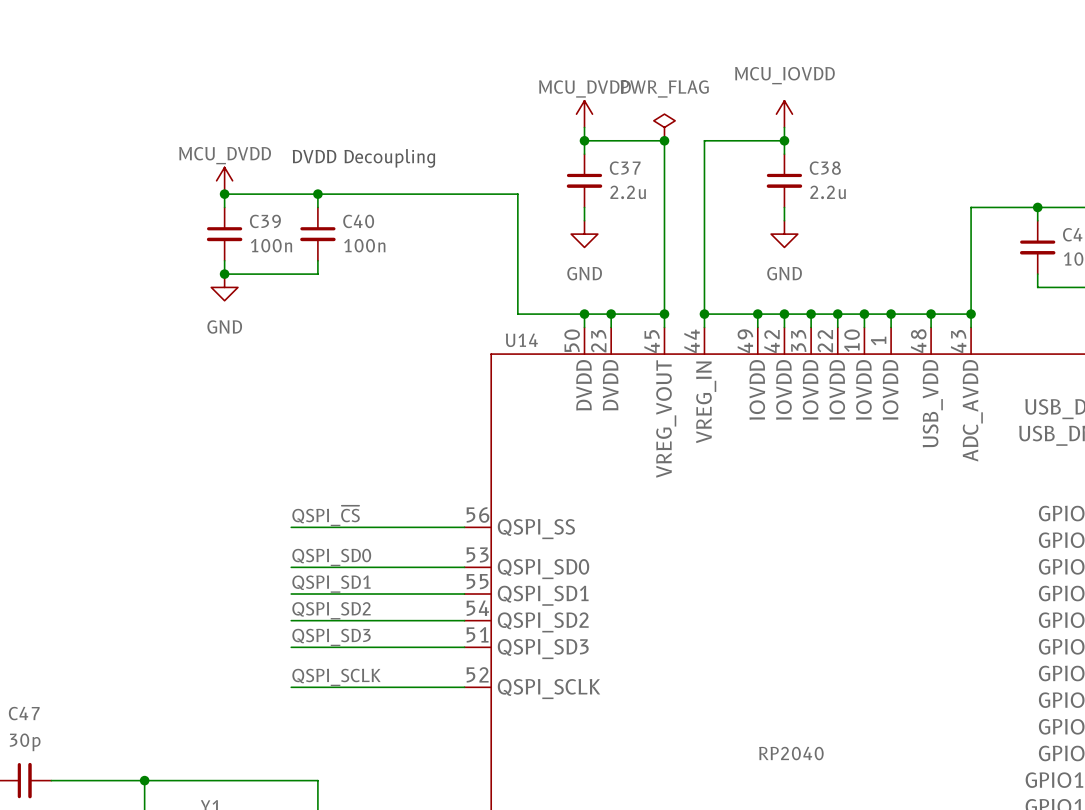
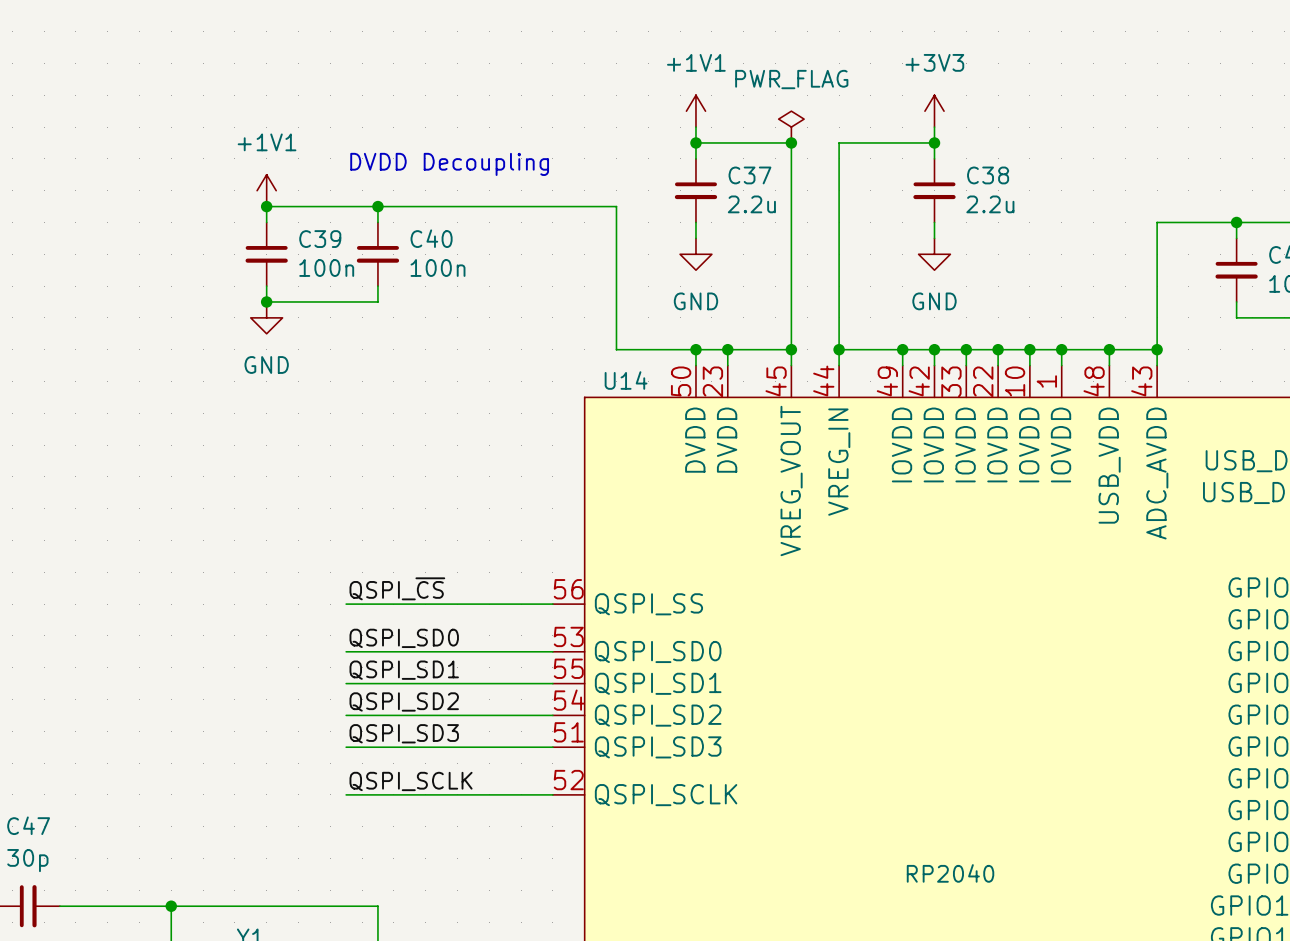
power symbol: MCU_DVDD (584, 114) -> +1V1 (695, 111)
power symbol: MCU_IOVDD (784, 114) -> +3V3 (934, 111)
power symbol: MCU_DVDD (224, 180) -> +1V1 (266, 190)

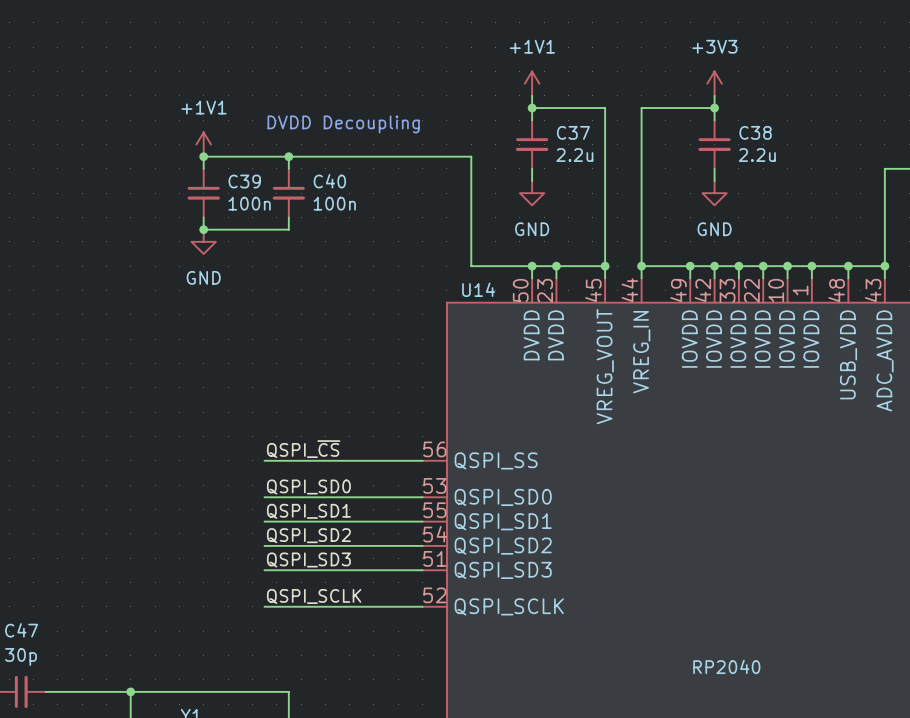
power symbol: PWR_FLAG (791, 127) -> none
junction: (791, 142) -> none

